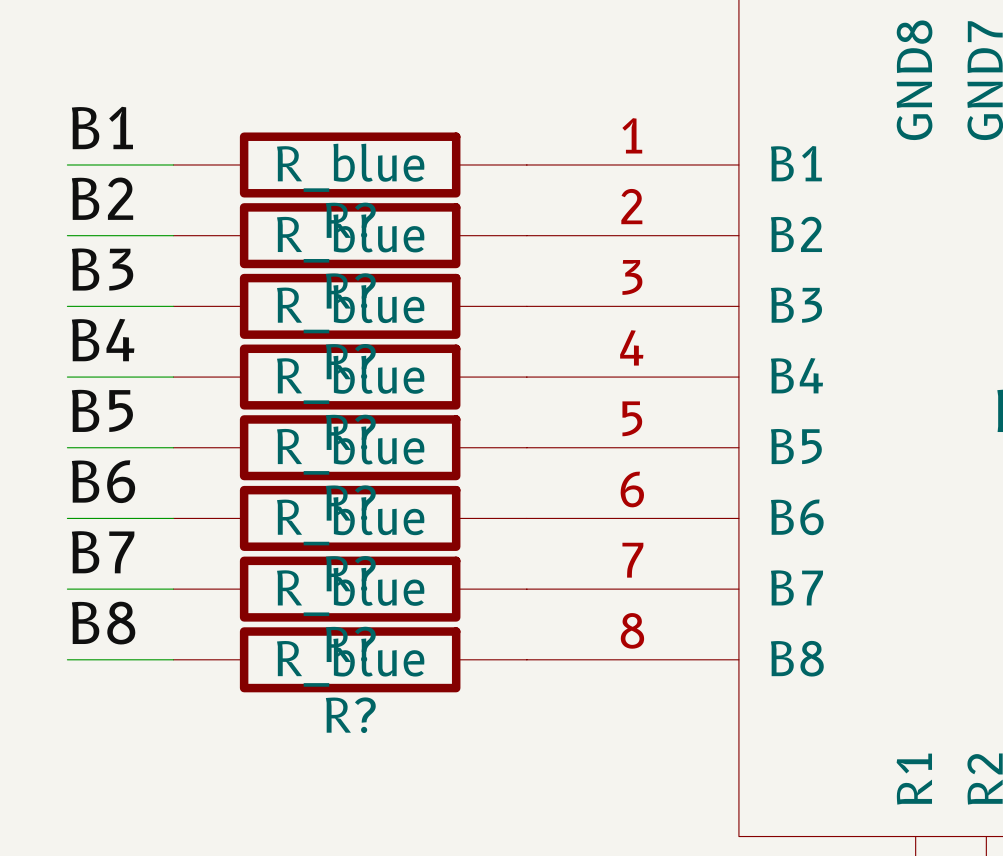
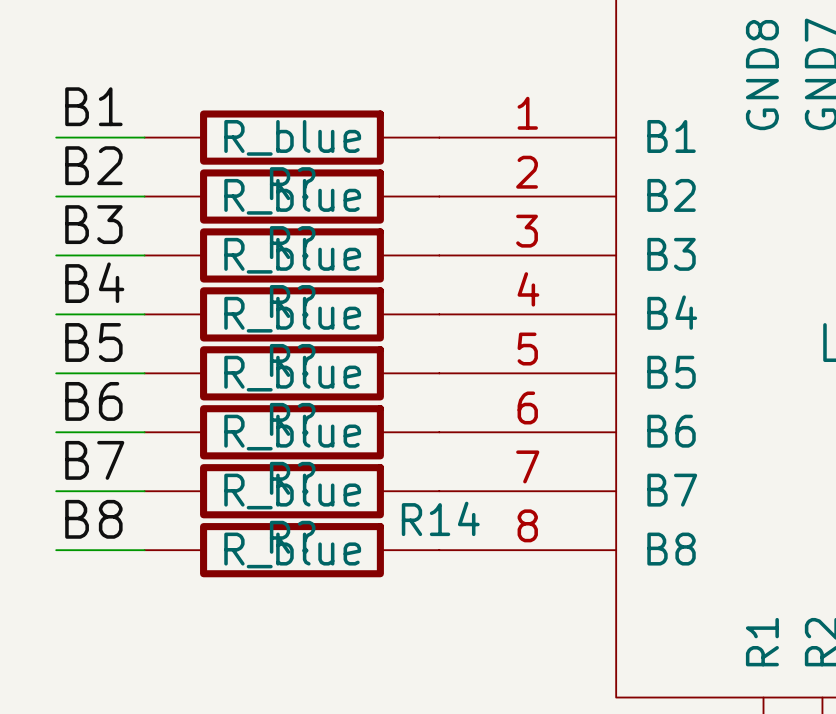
R? name: R? (350, 715) -> R14 (440, 518)

